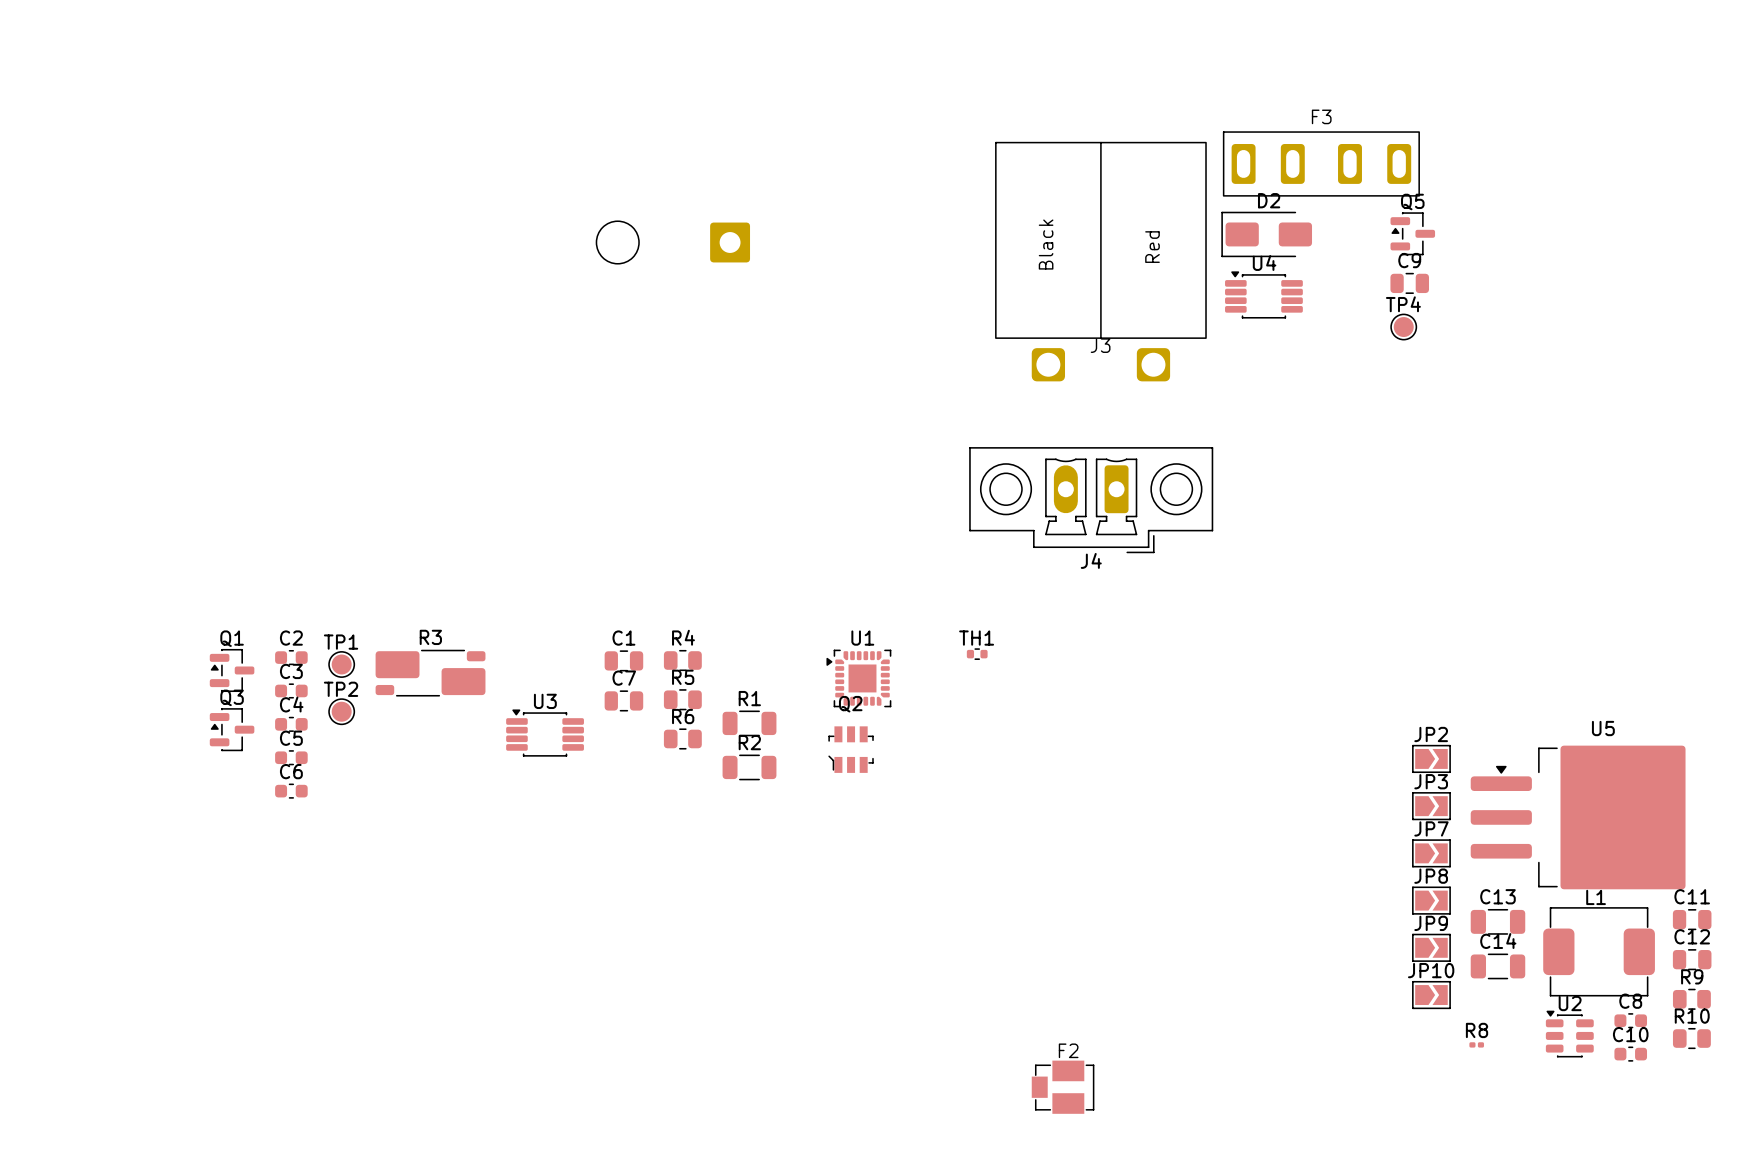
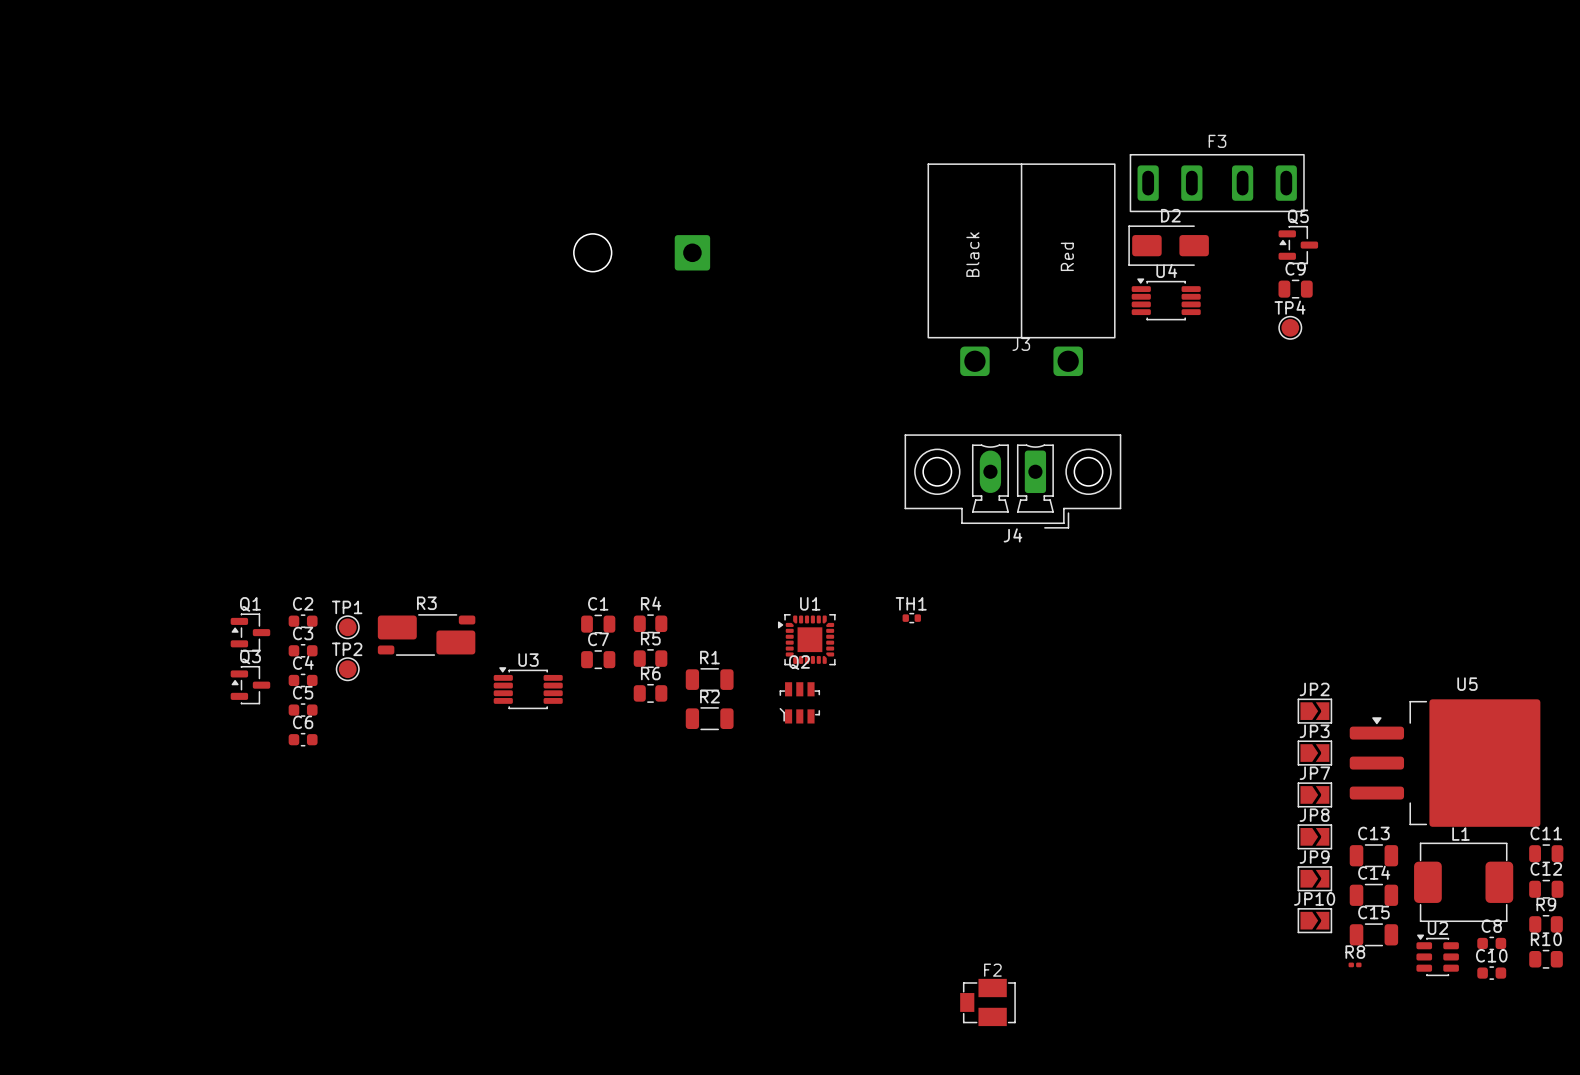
C15: none -> (1373, 934)

